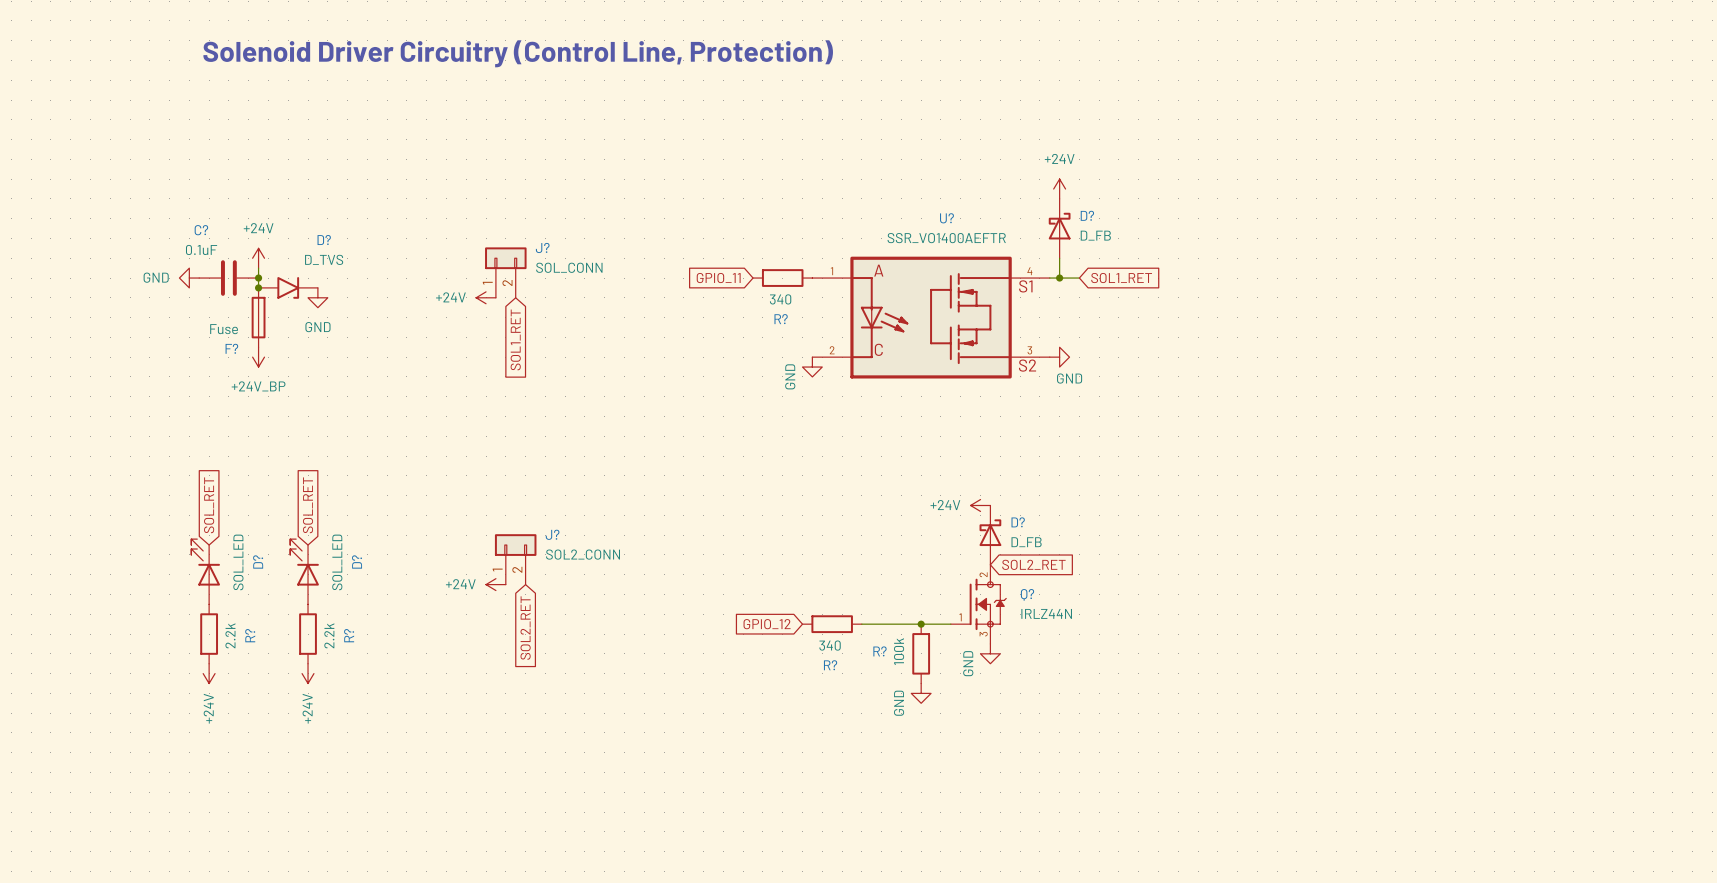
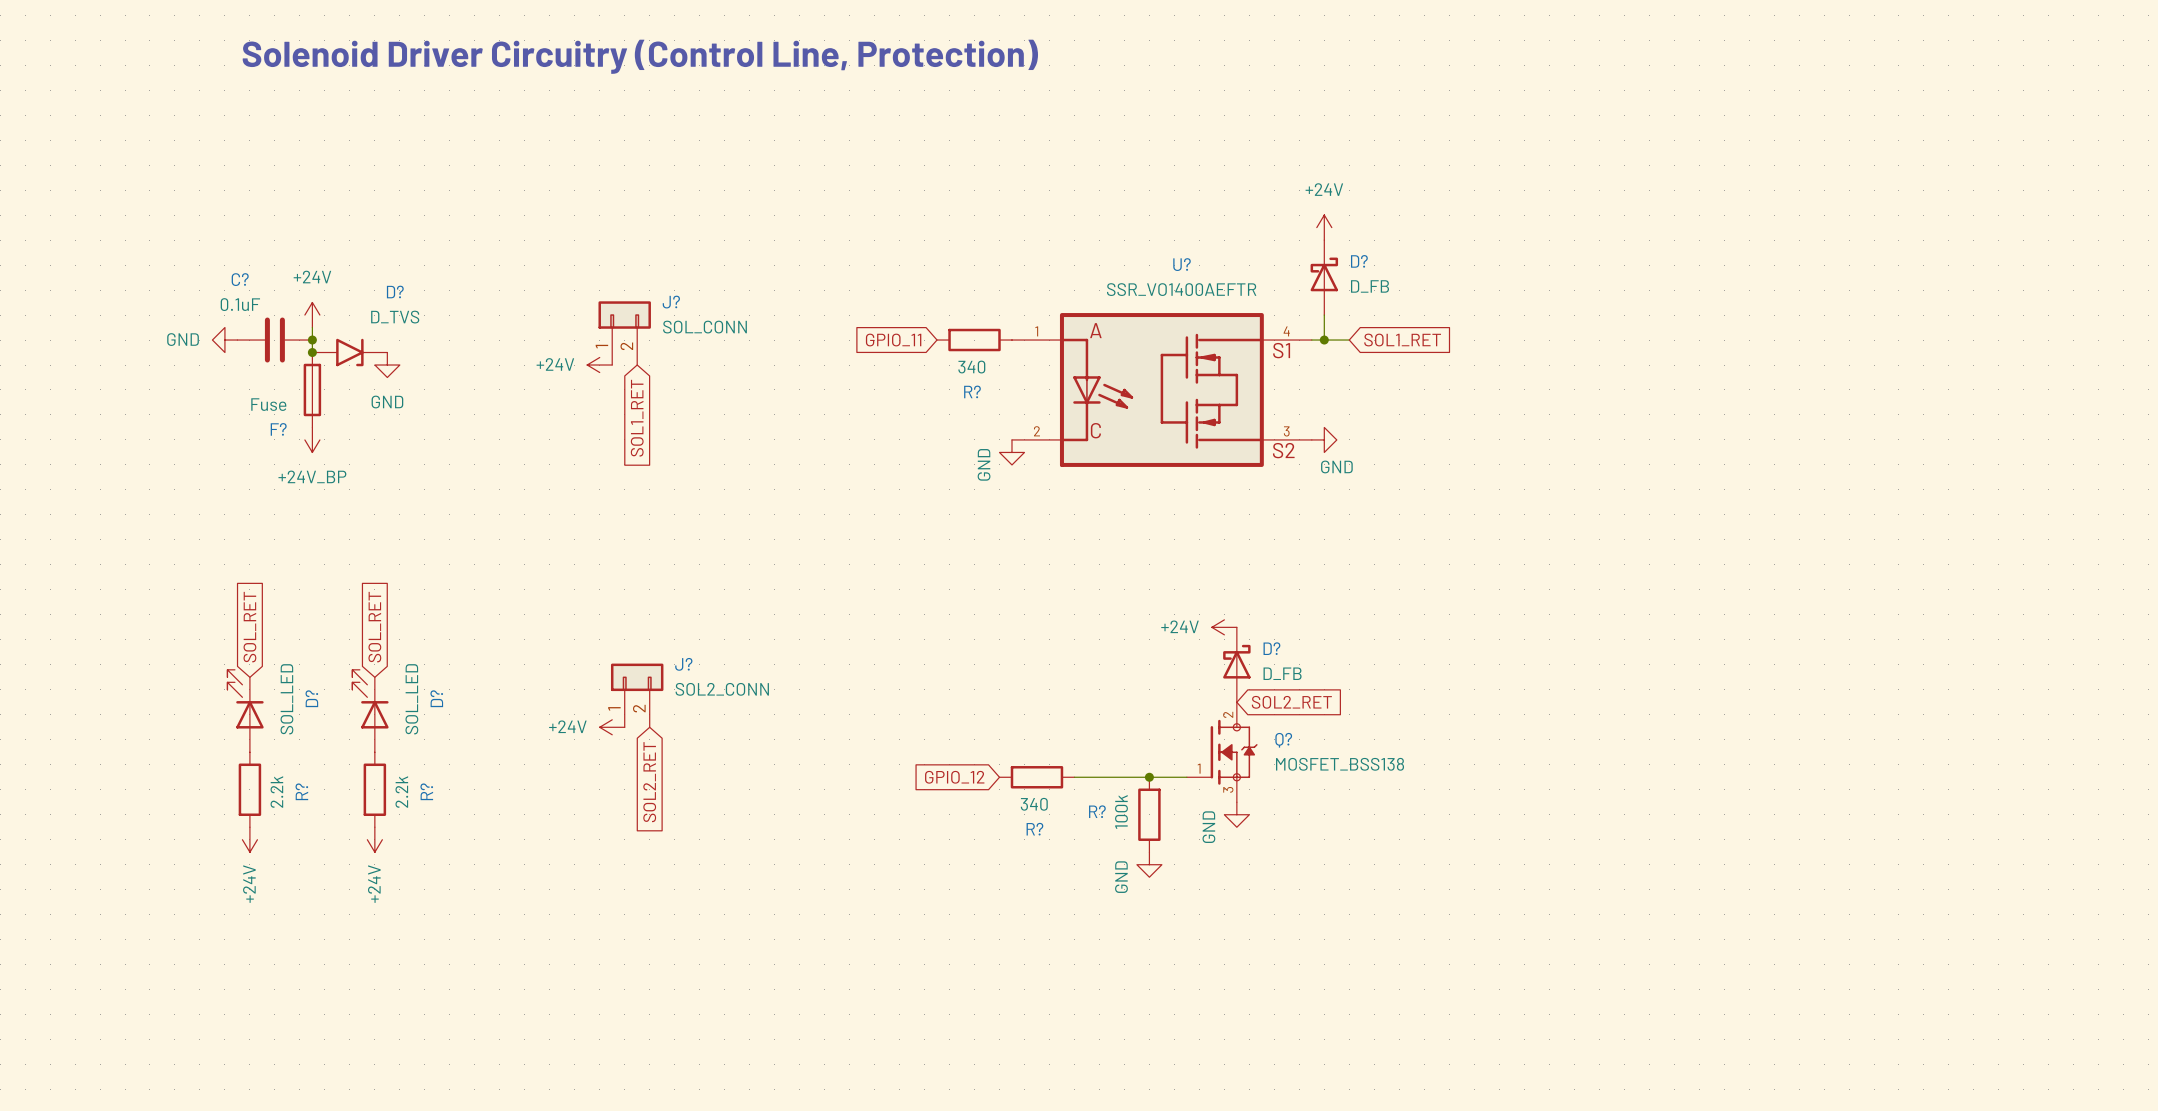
Q? value: IRLZ44N (1046, 613) -> MOSFET_BSS138 (1340, 764)

